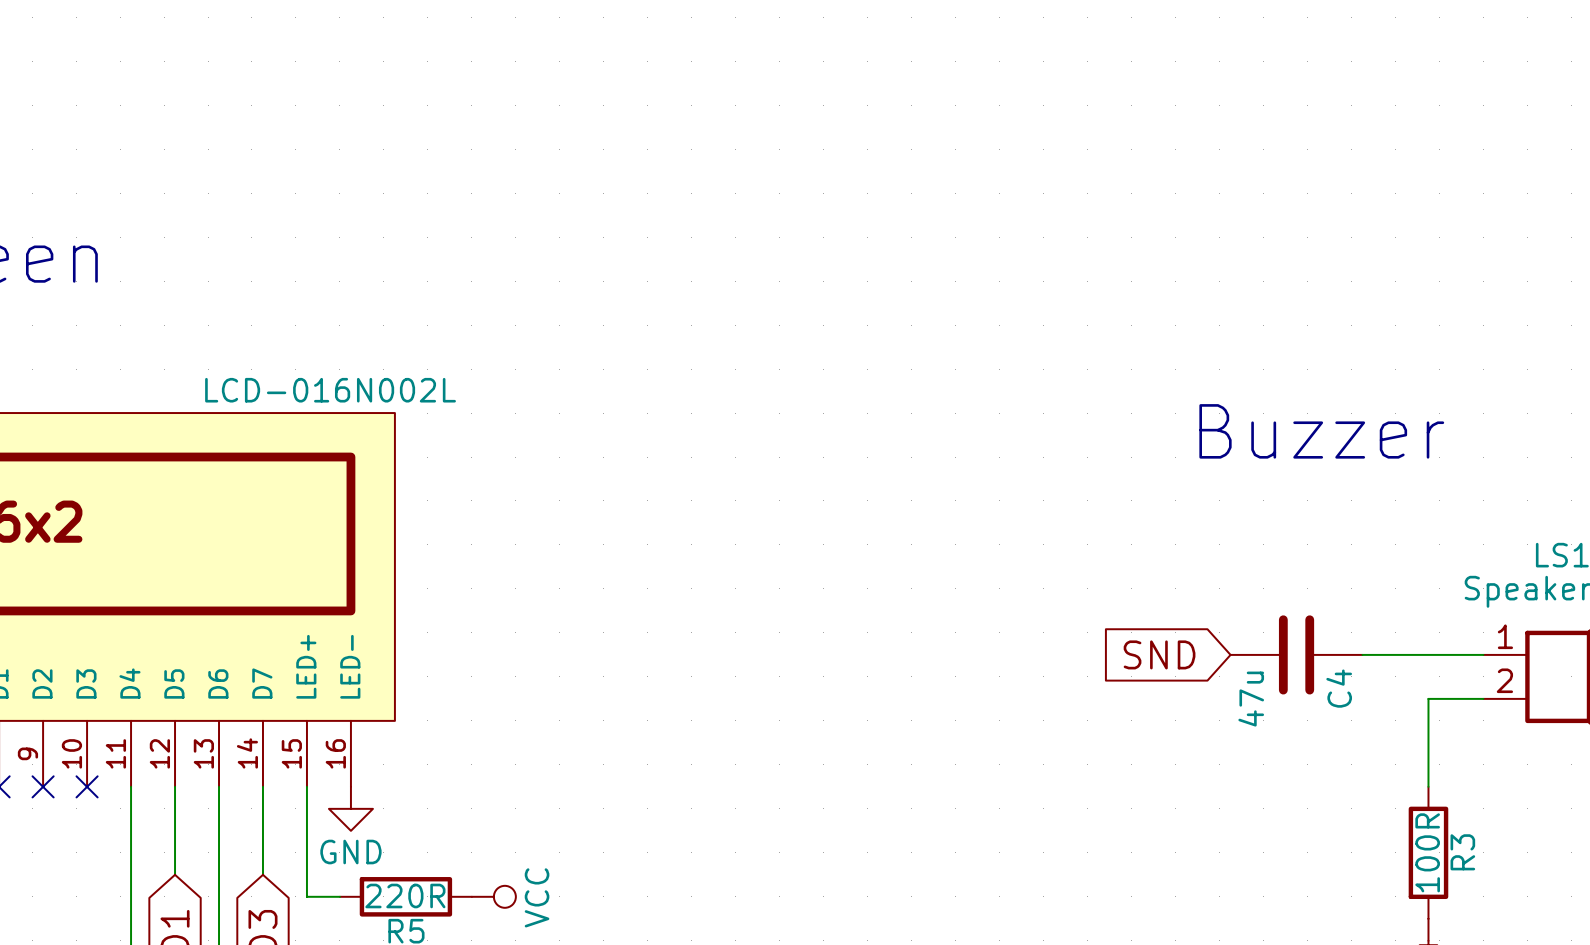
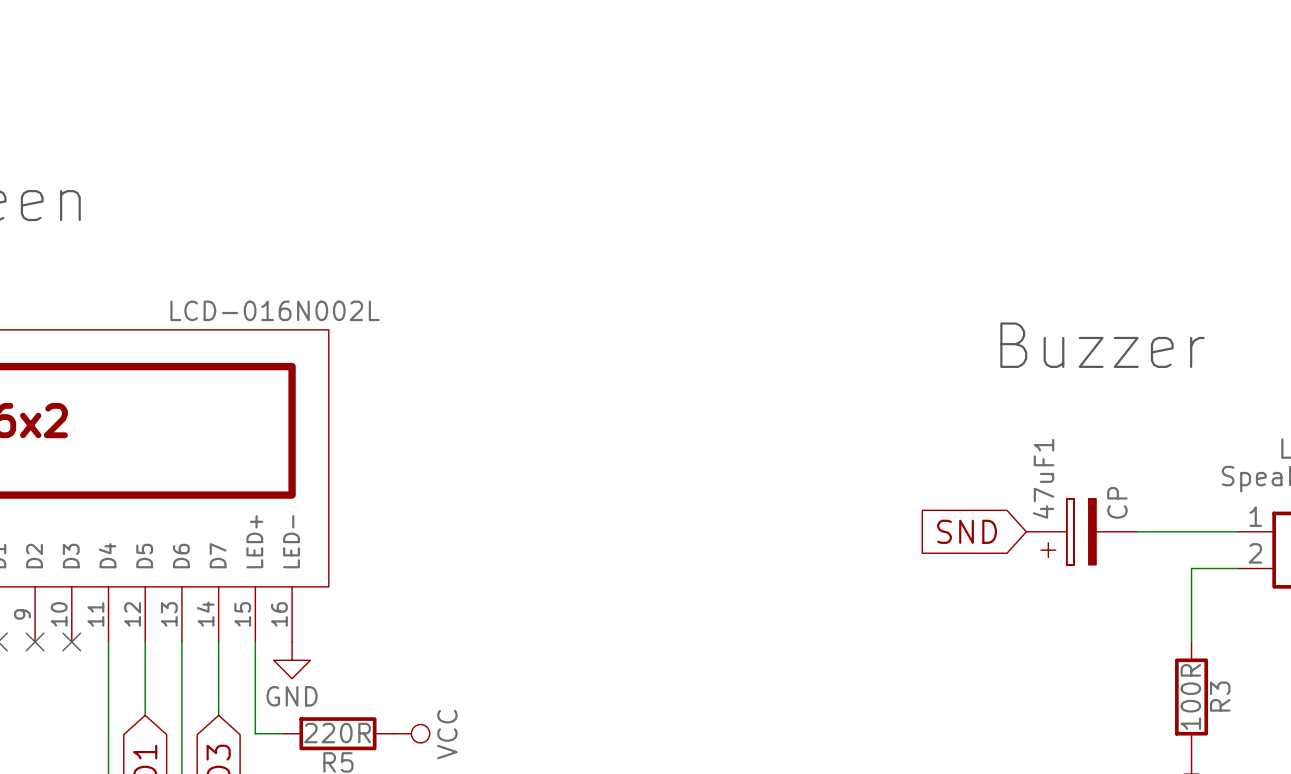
C4: 47u (1296, 654) -> none
47uF1: none -> CP (1081, 531)

